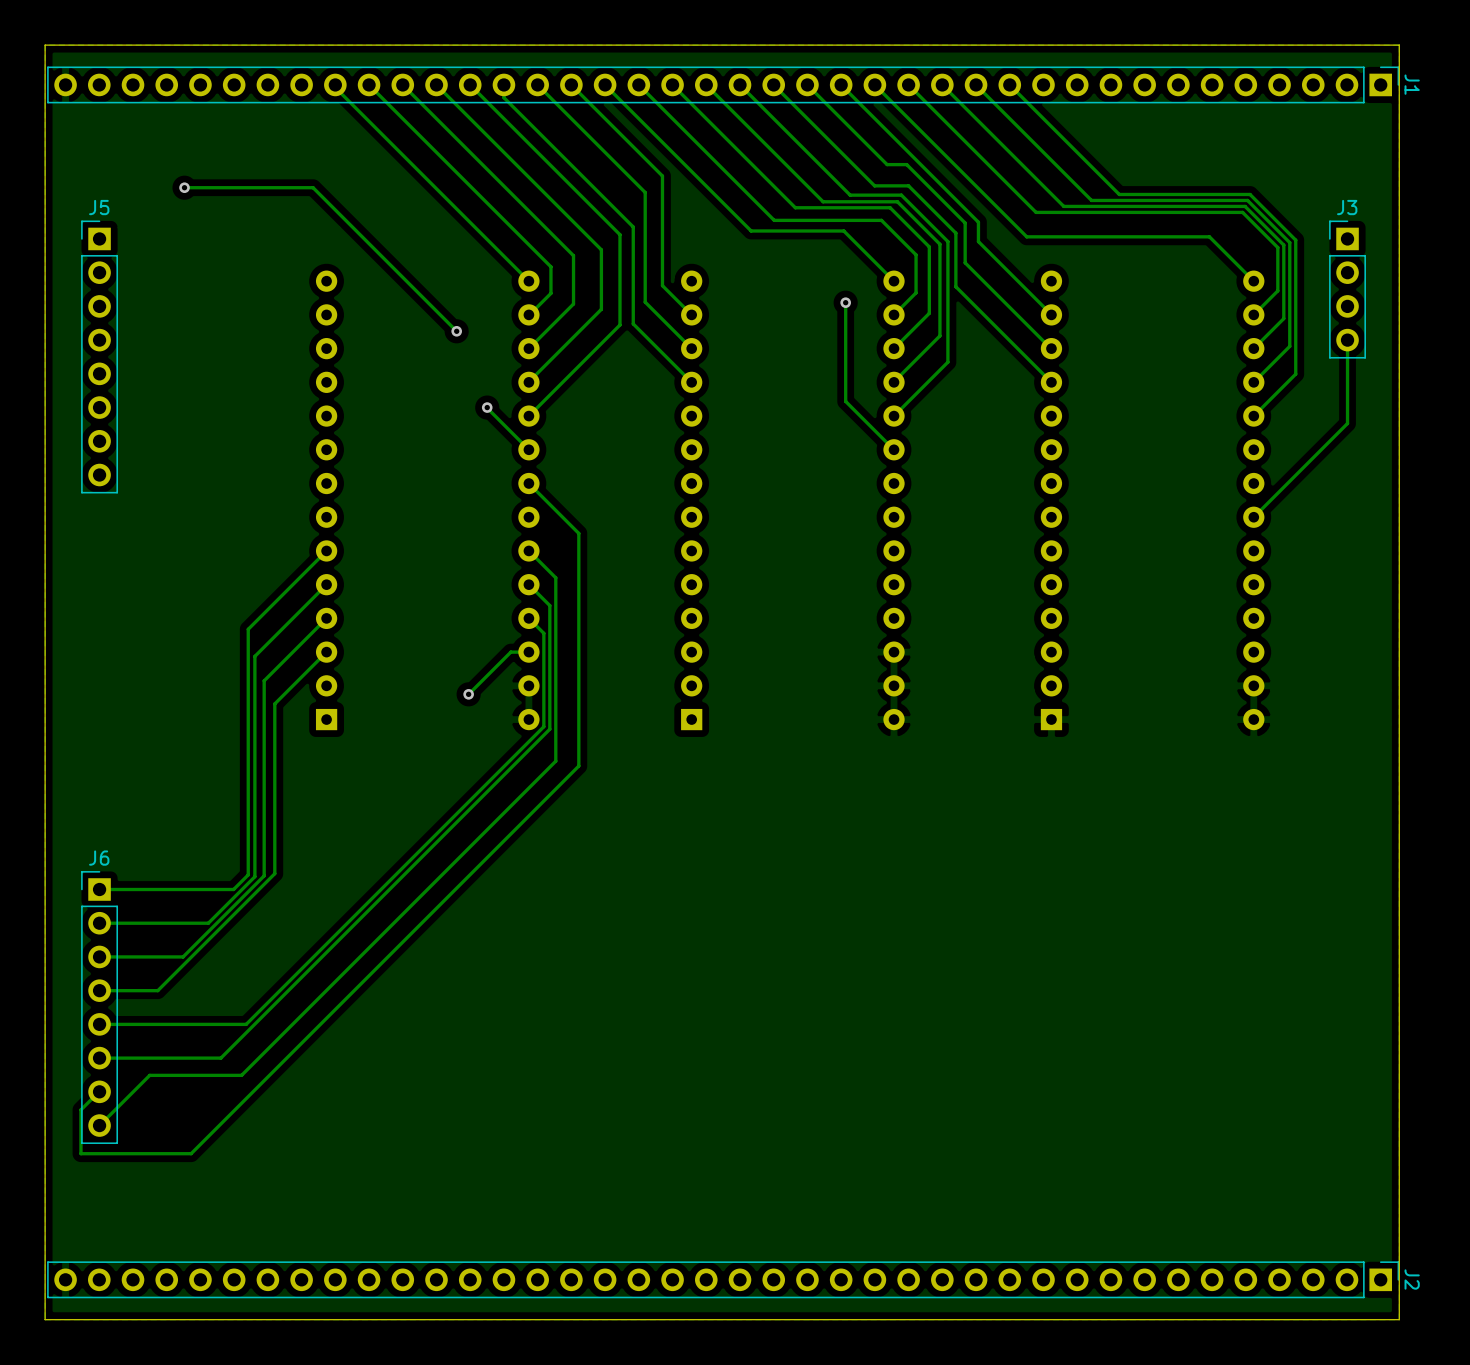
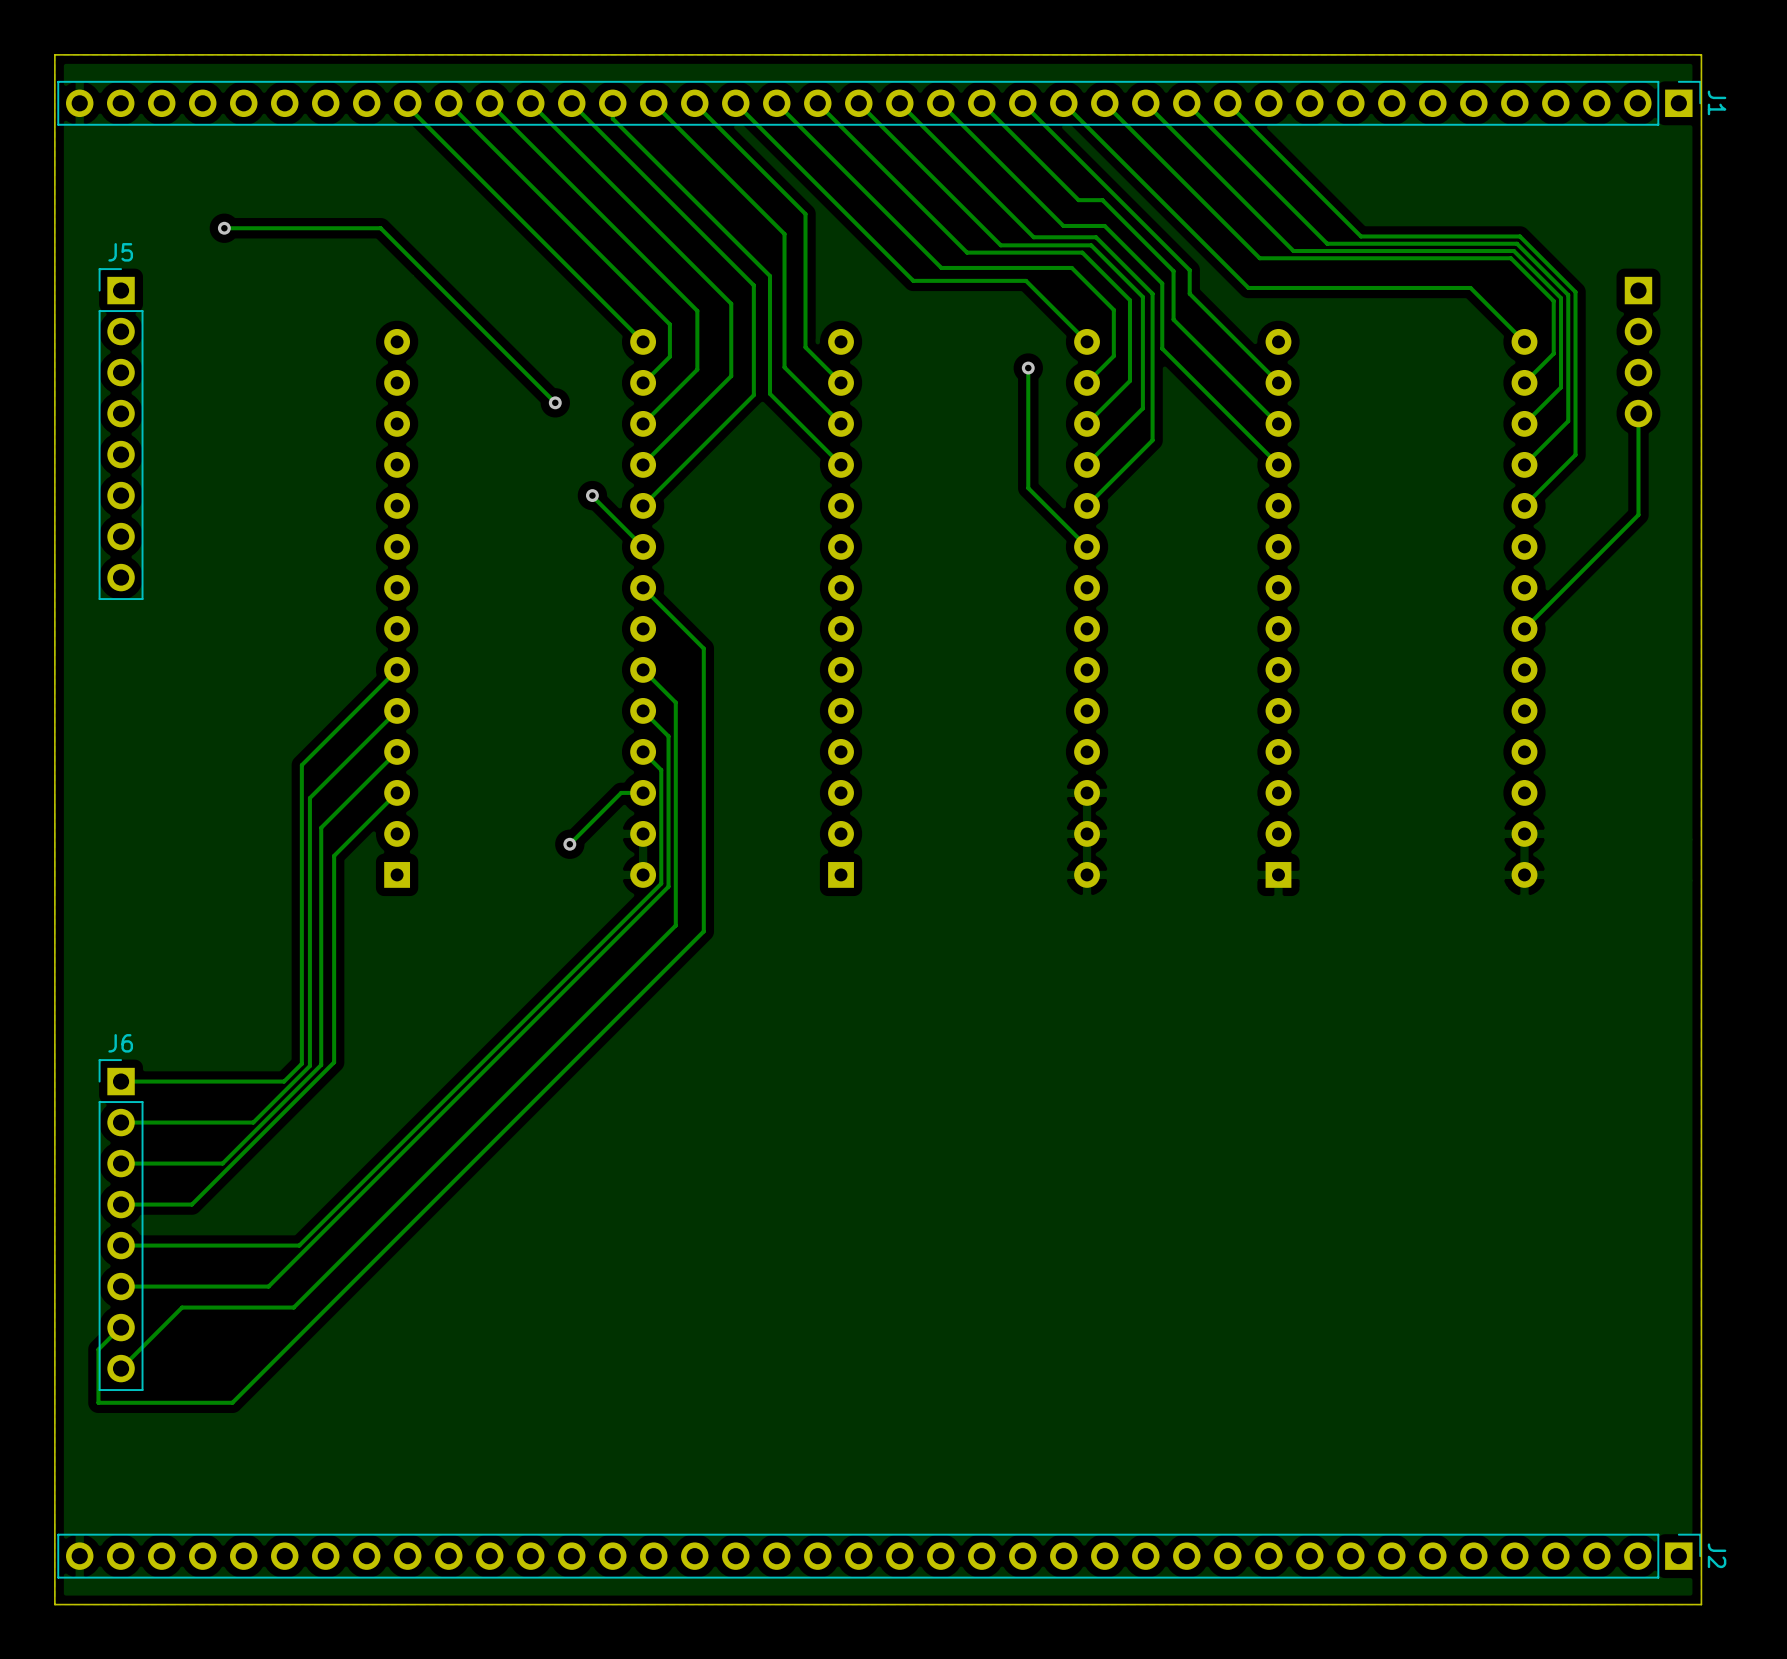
J3 side: bottom (1347, 289) -> top (1638, 352)

